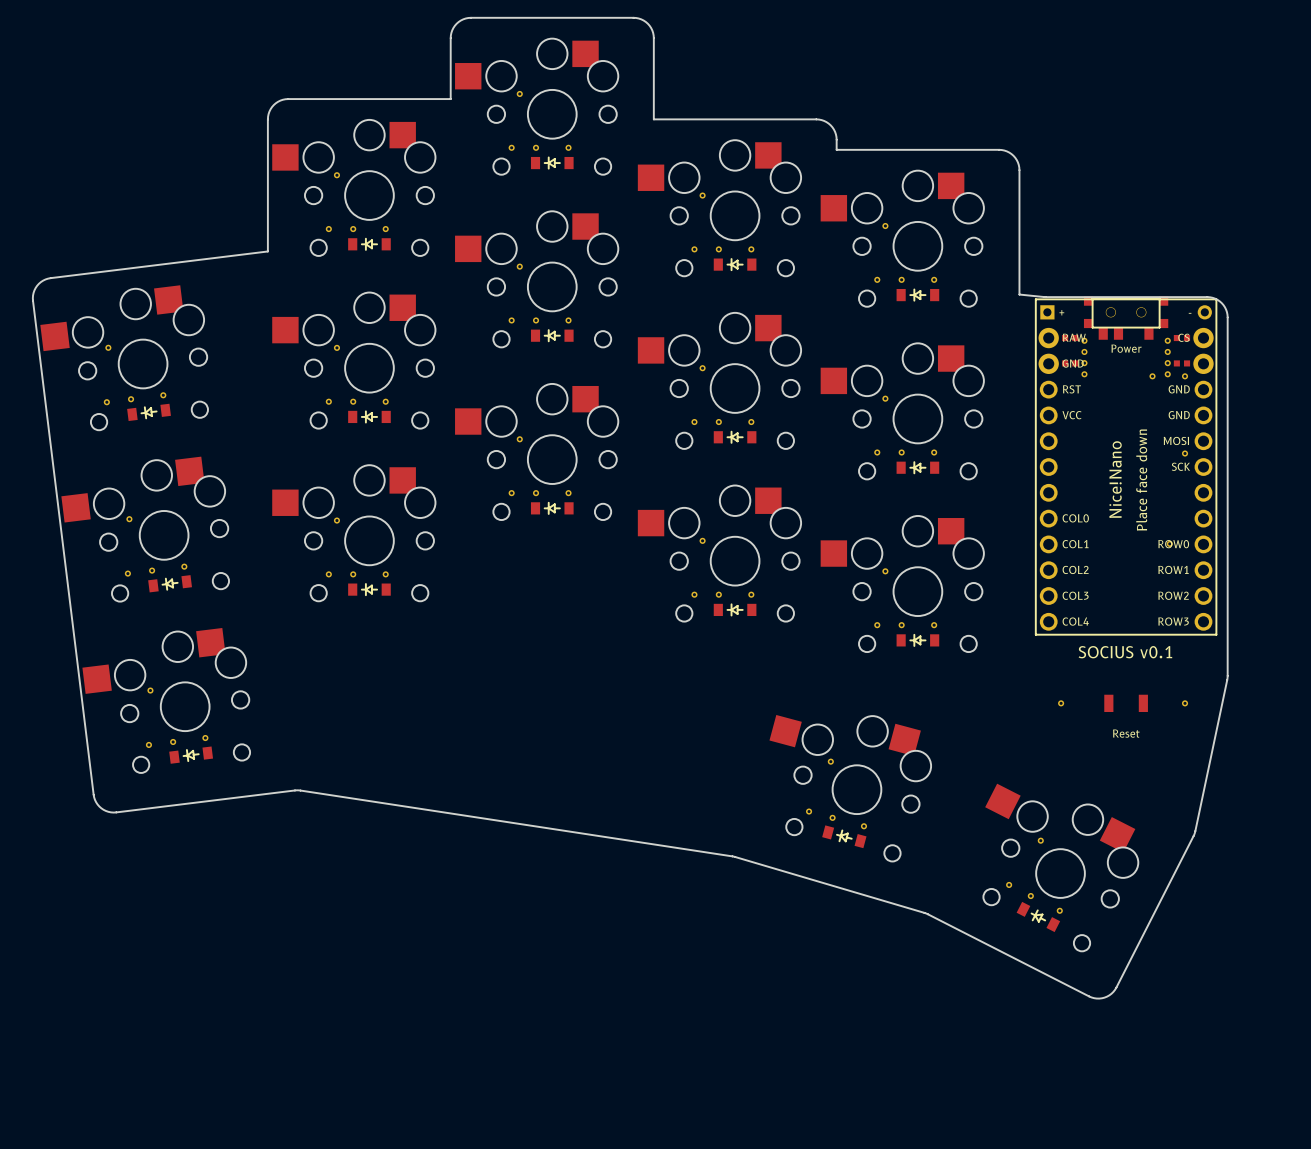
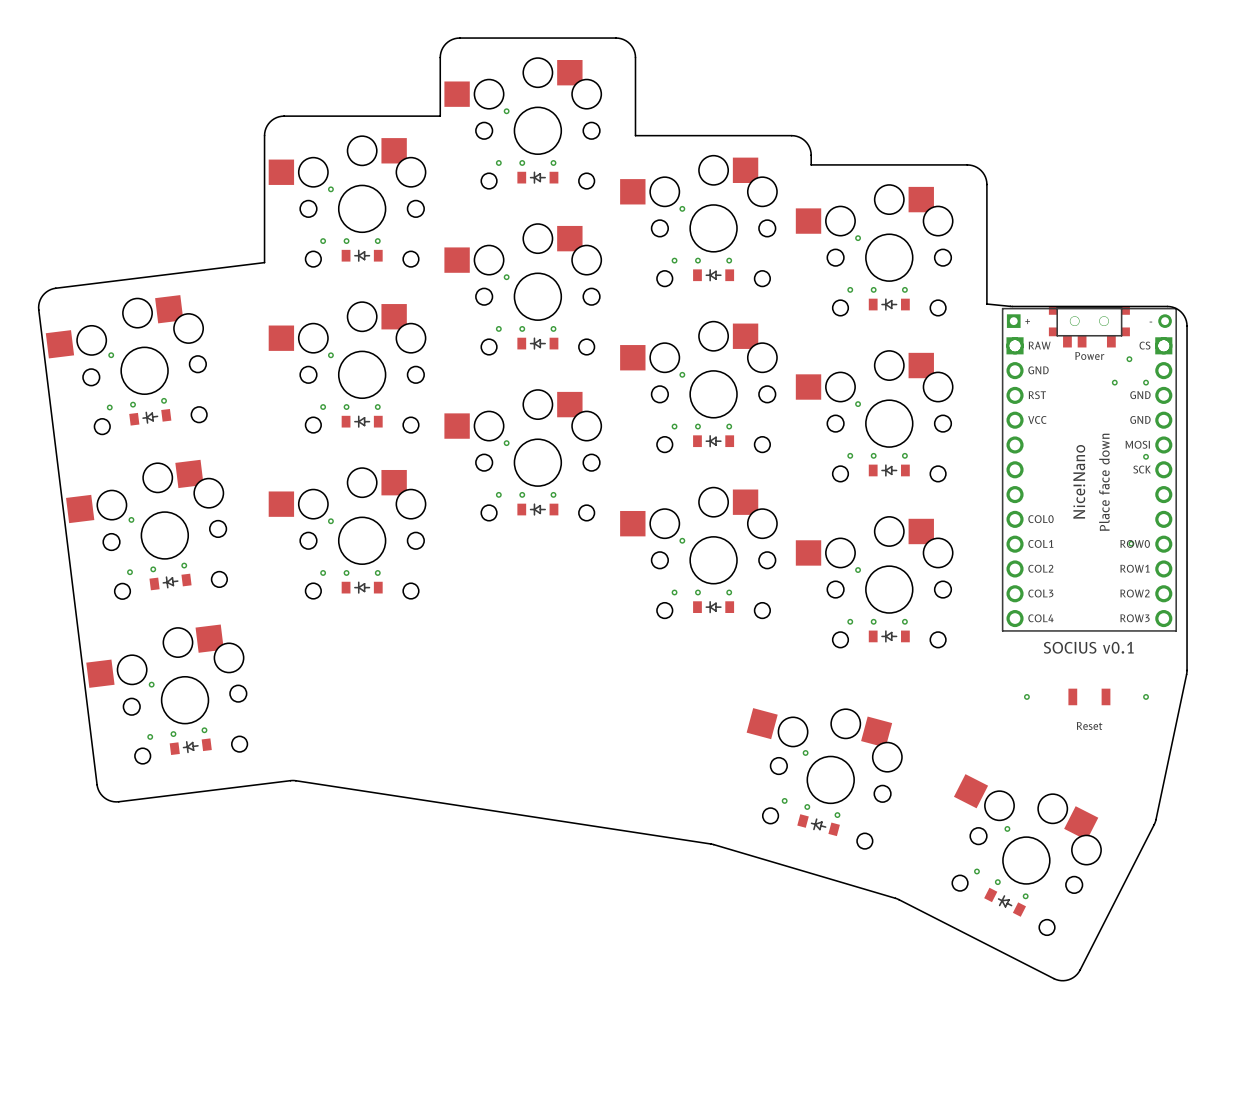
part footprint: [1035, 298, 1218, 636] -> [1001, 307, 1177, 632]
part: (1084, 340) -> none
part: (1167, 340) -> none
part: (1084, 351) -> none
part: (1084, 363) -> none
part: (1167, 363) -> none
part: (1084, 374) -> none
part: (1167, 374) -> none

